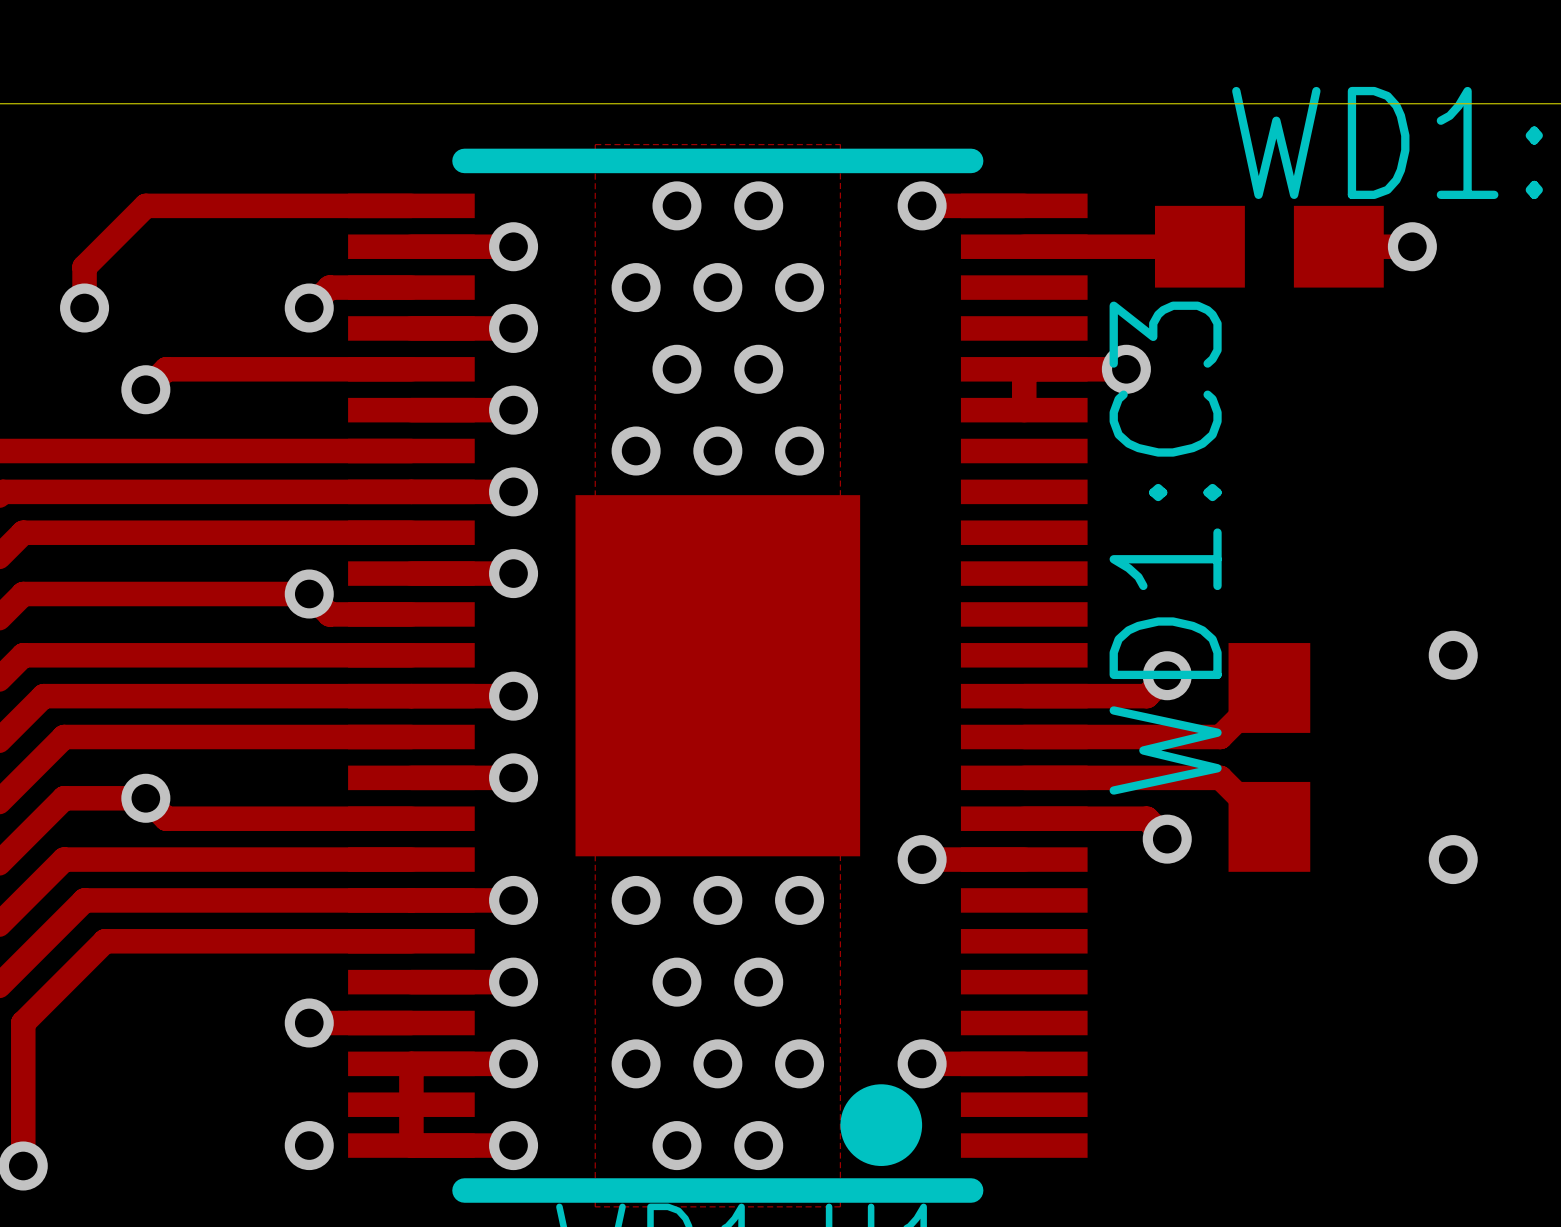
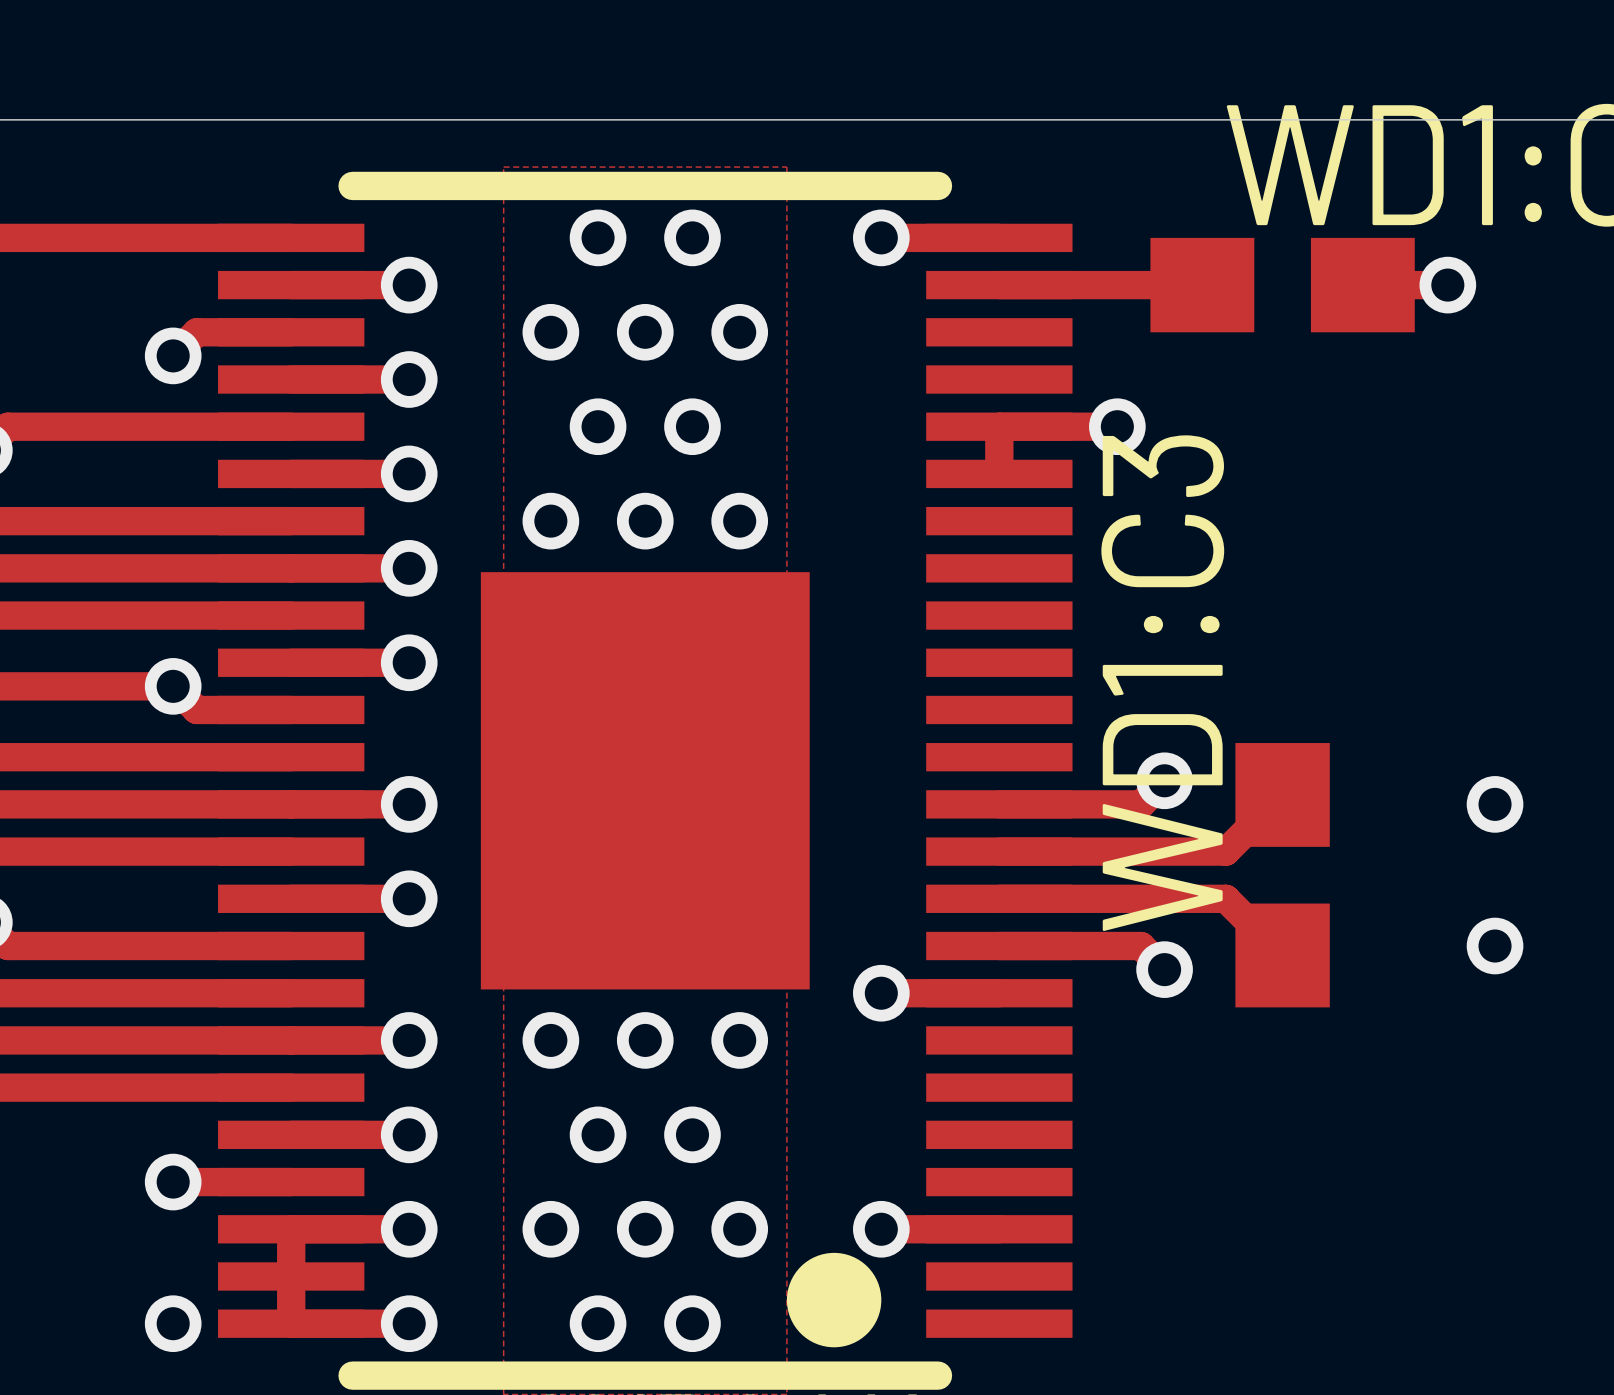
via position: (1453, 655) -> (1495, 804)
via position: (1453, 859) -> (1495, 946)

